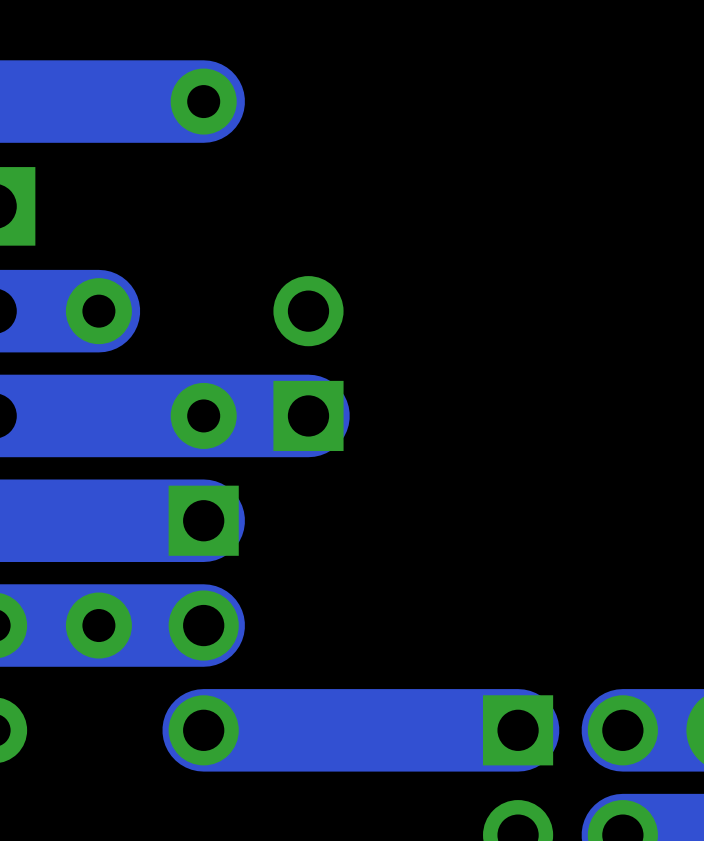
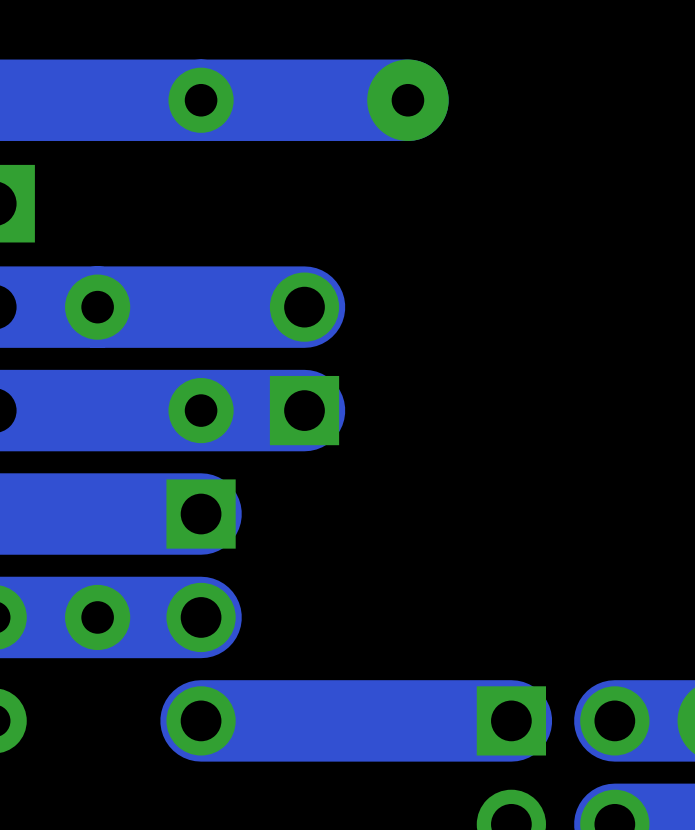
track: none -> (407, 100) (201, 100)
via: none -> (407, 100)
track: none -> (304, 307) (97, 307)

